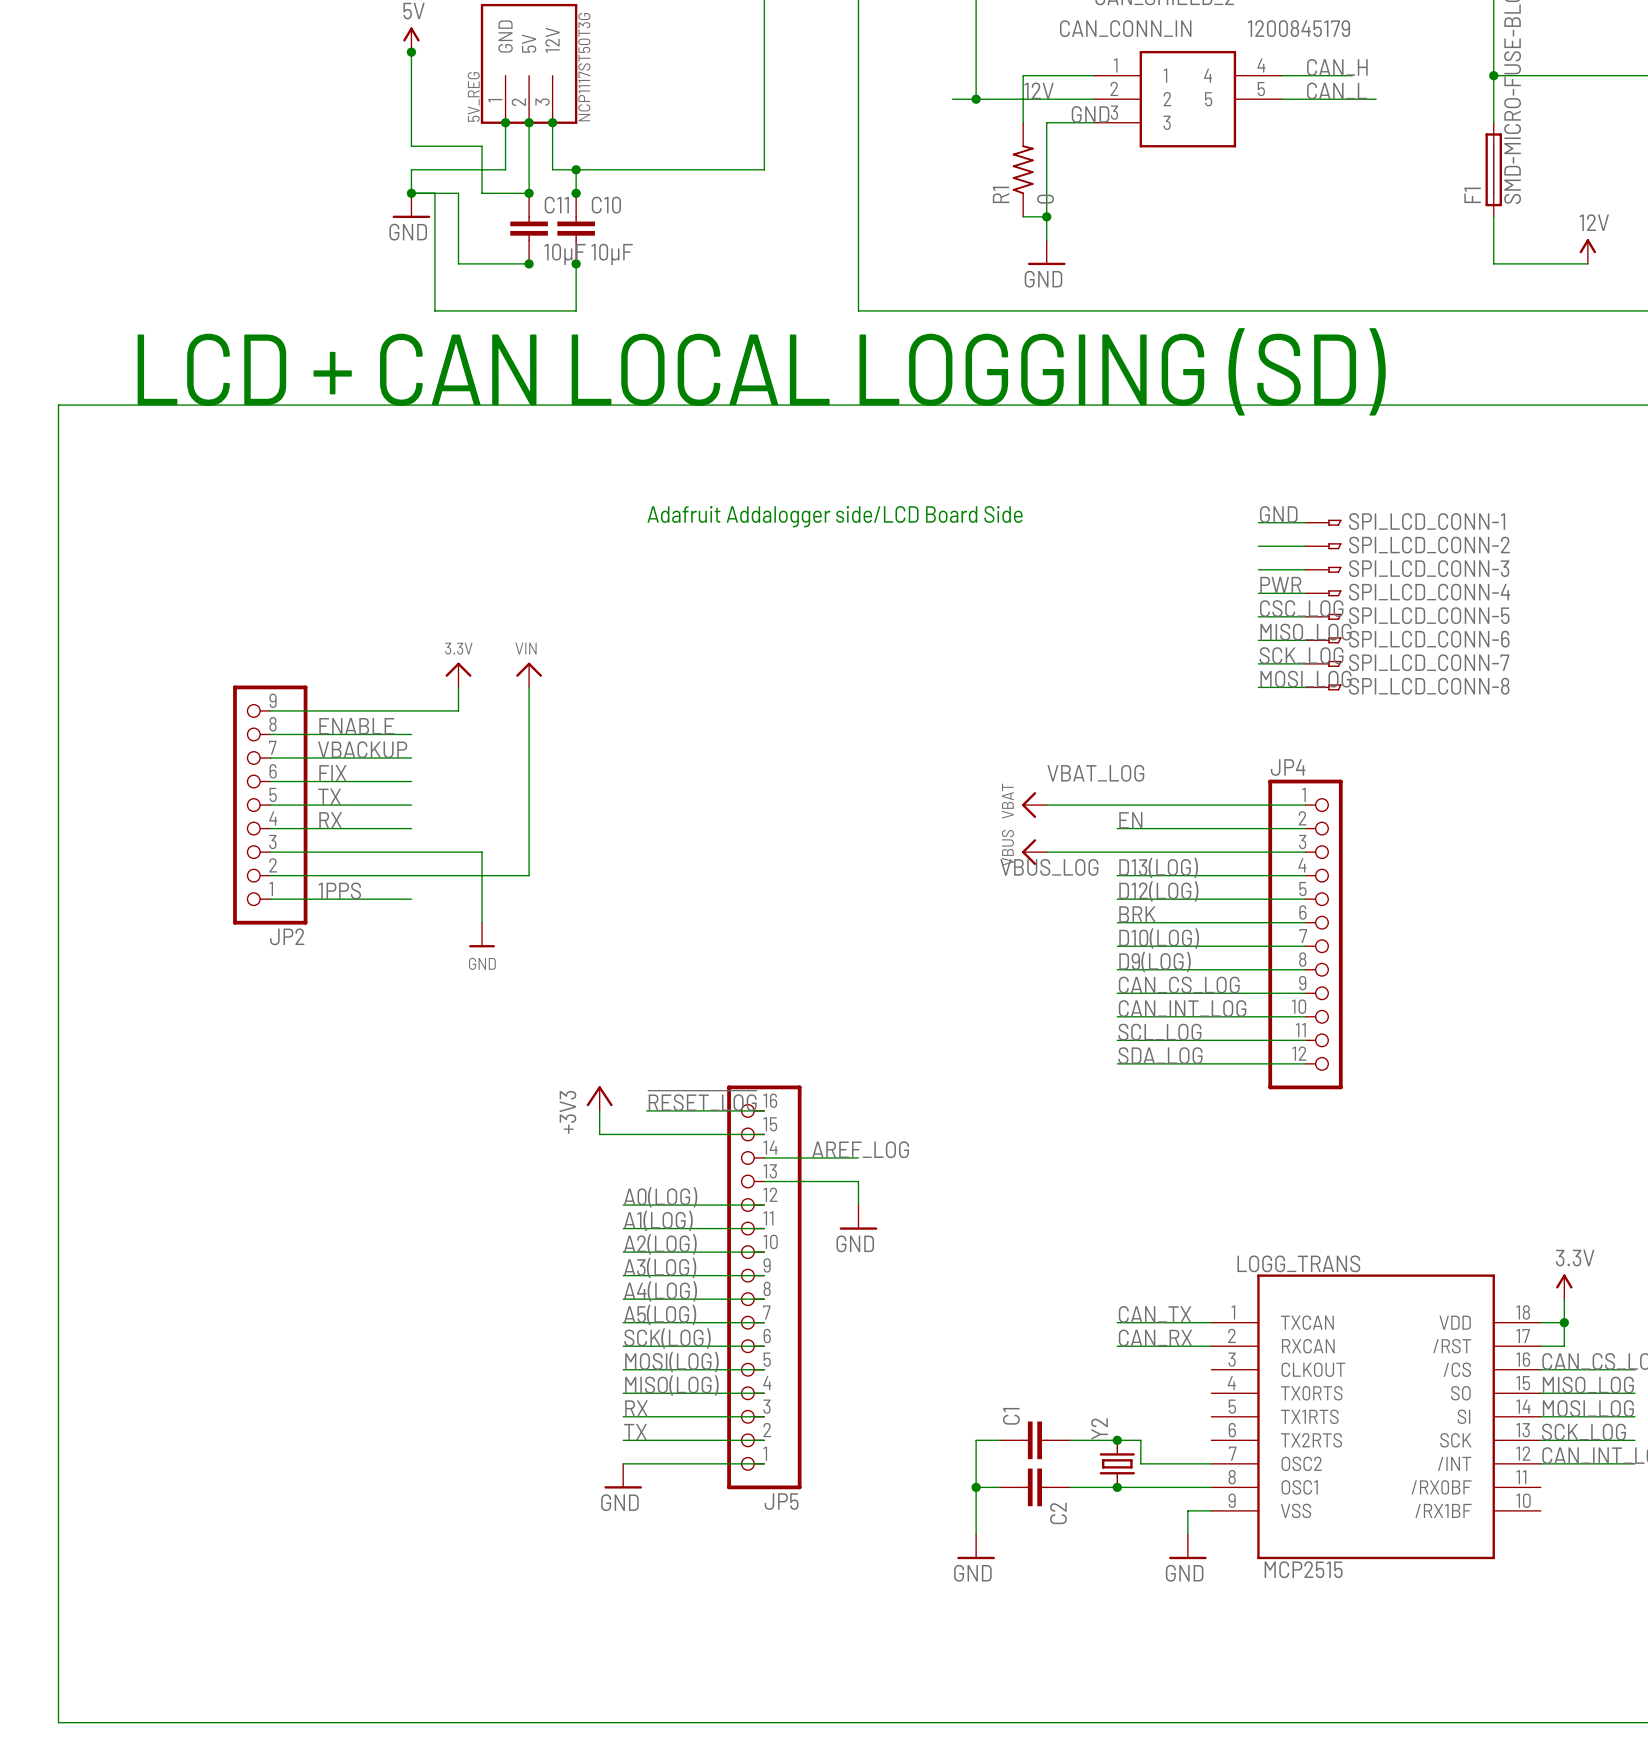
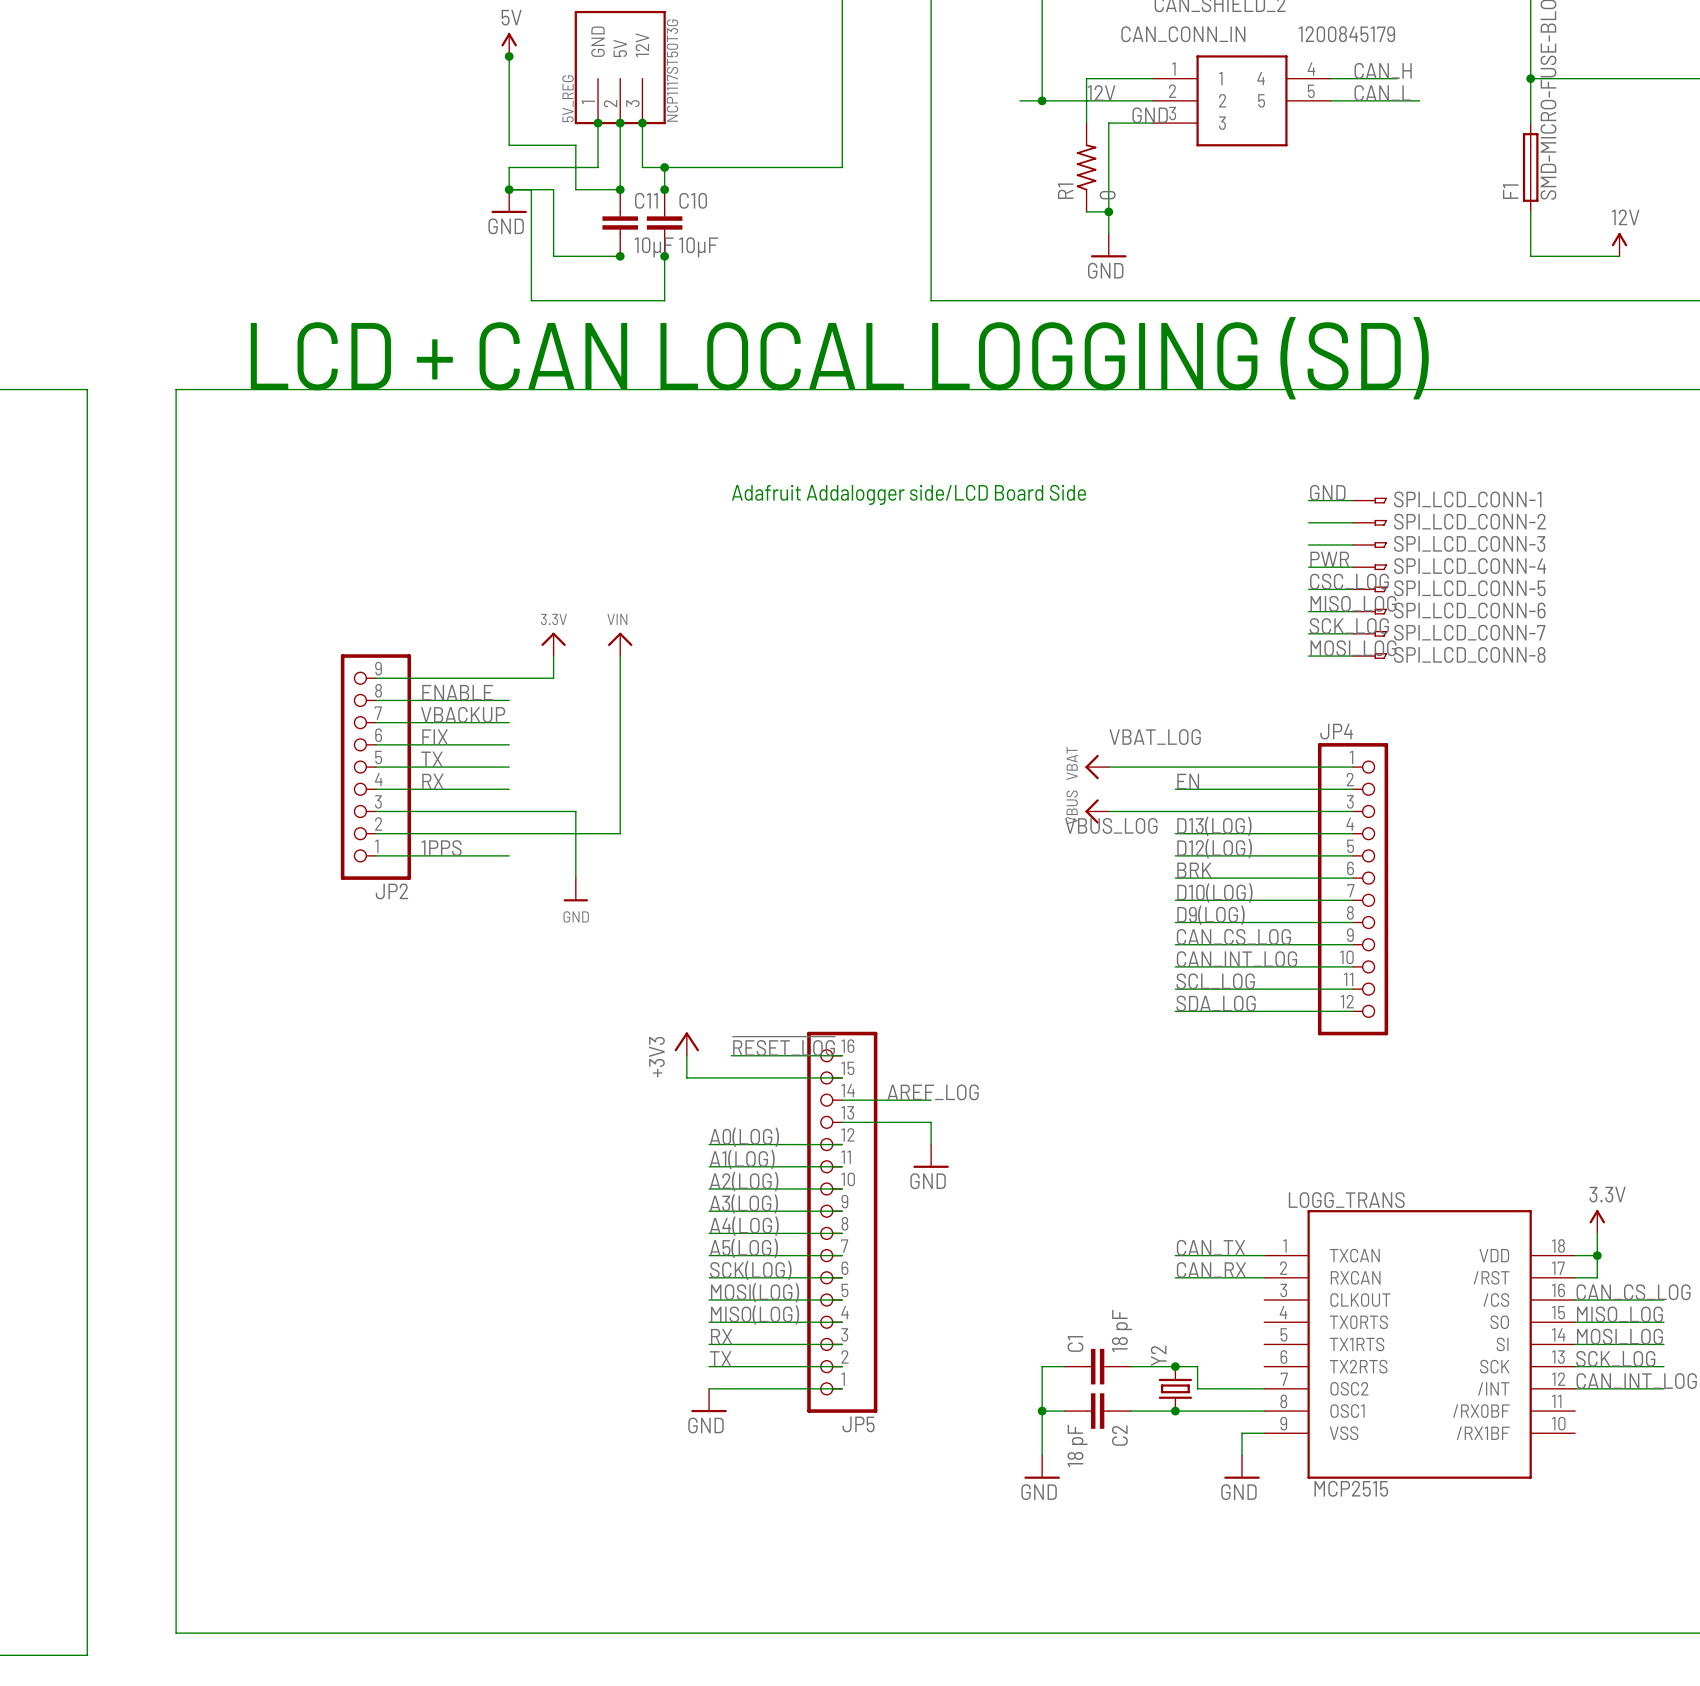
C1 value: none -> 18 pF (1121, 1331)
C2 value: none -> 18 pF (1077, 1445)

